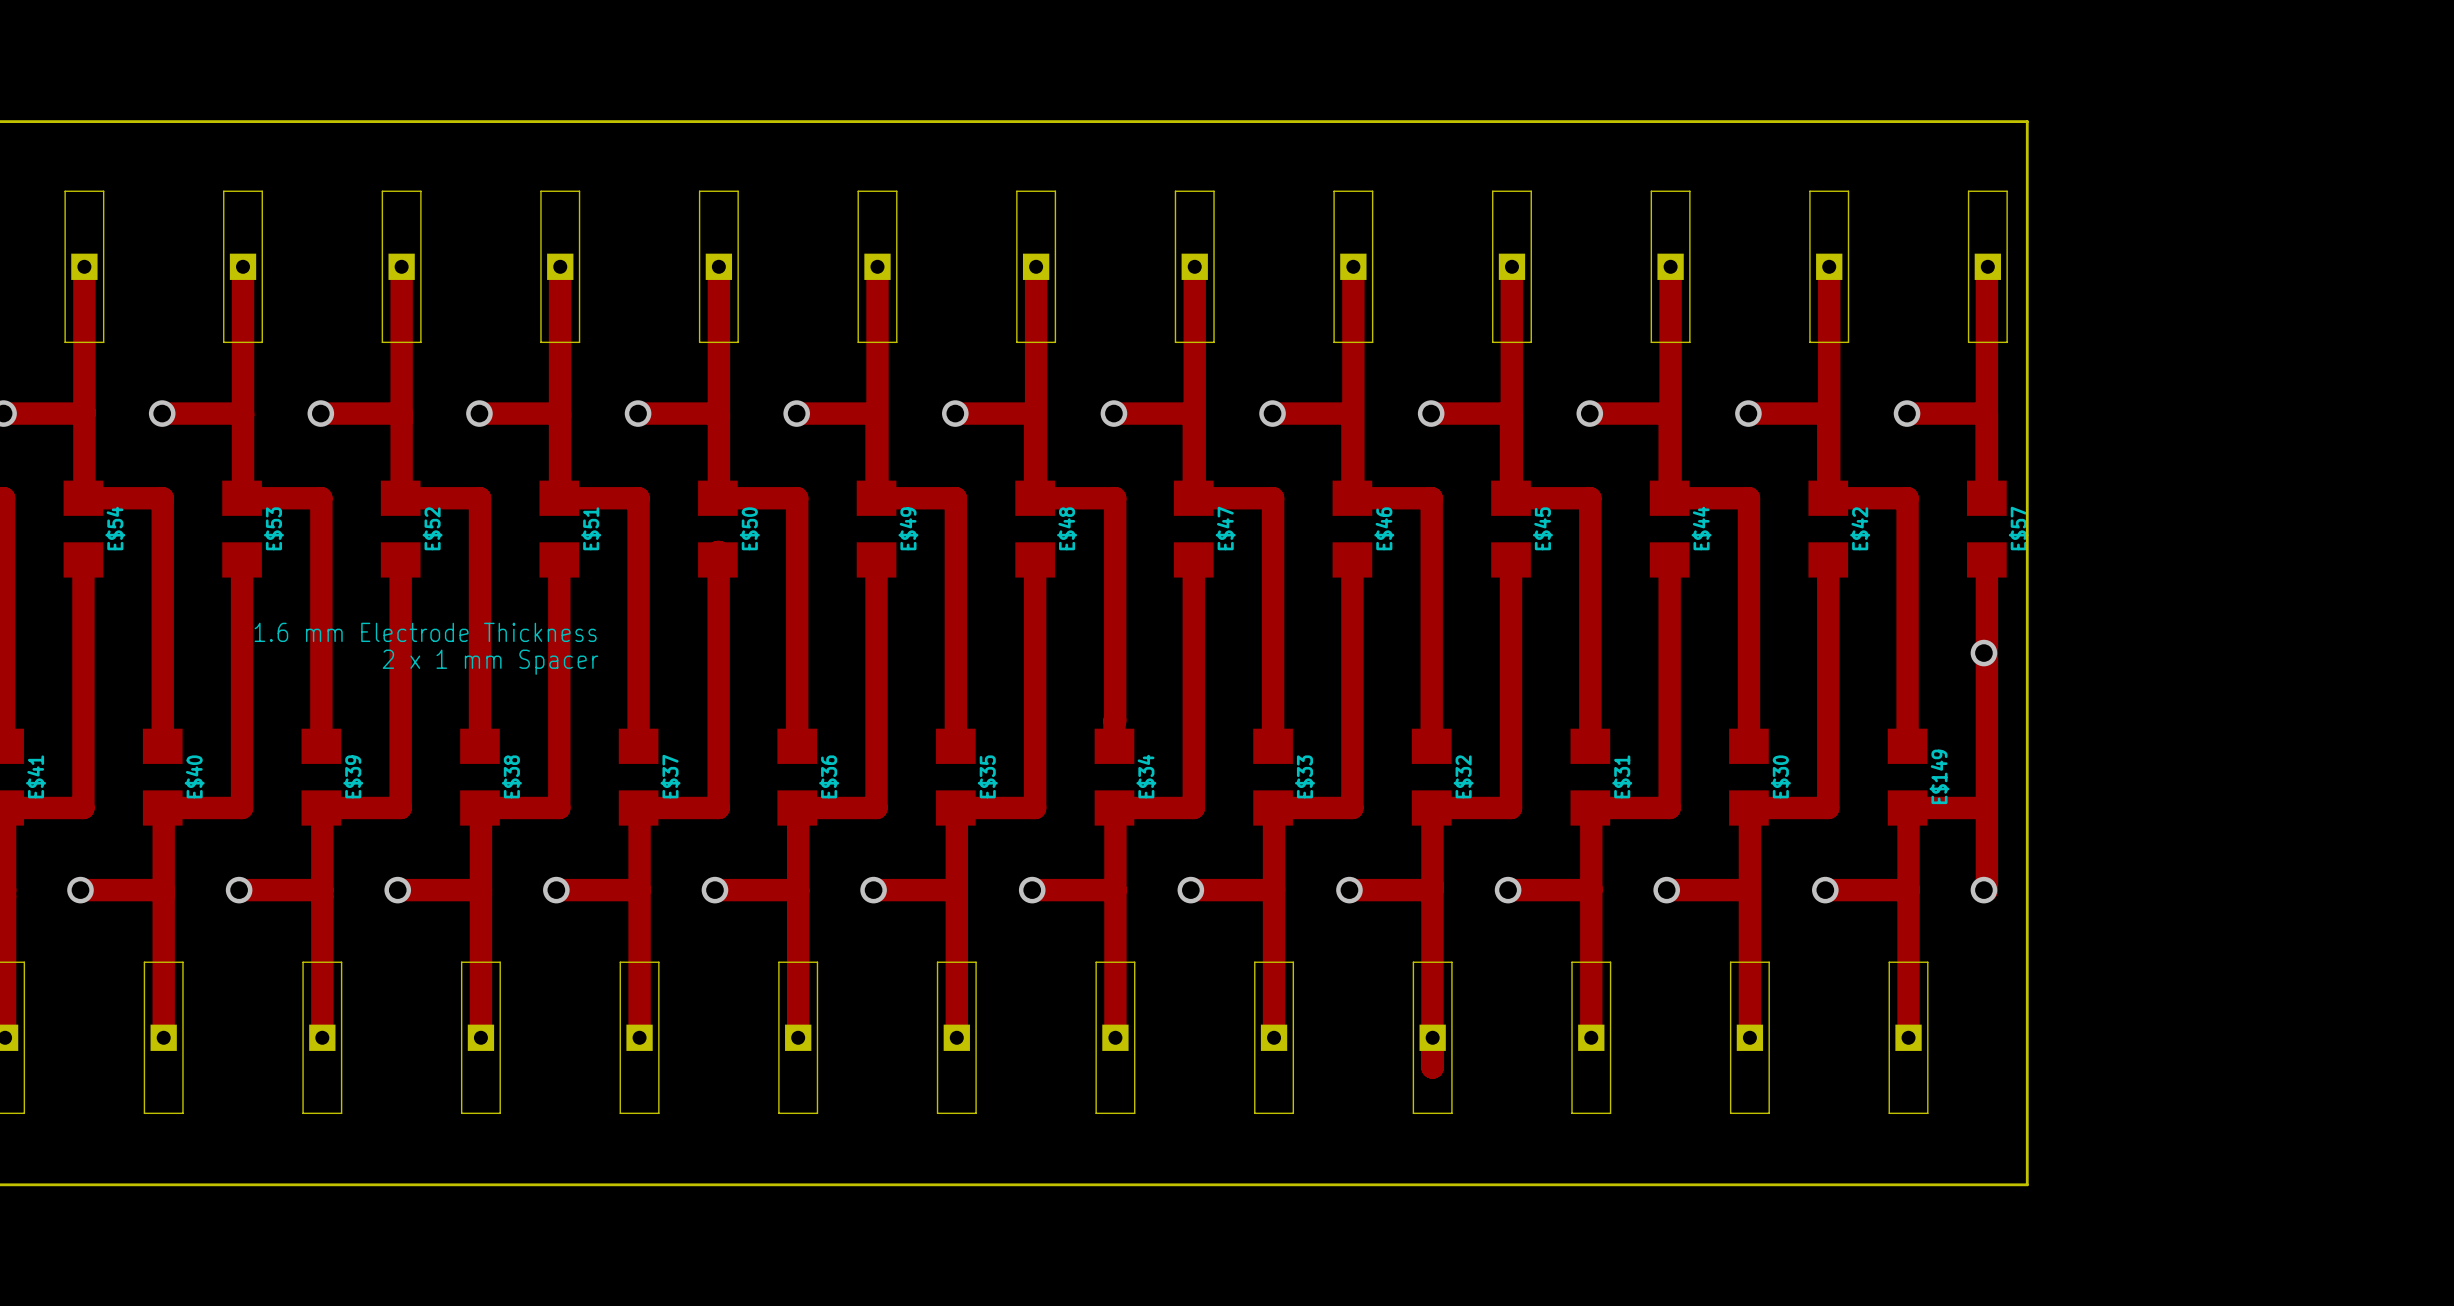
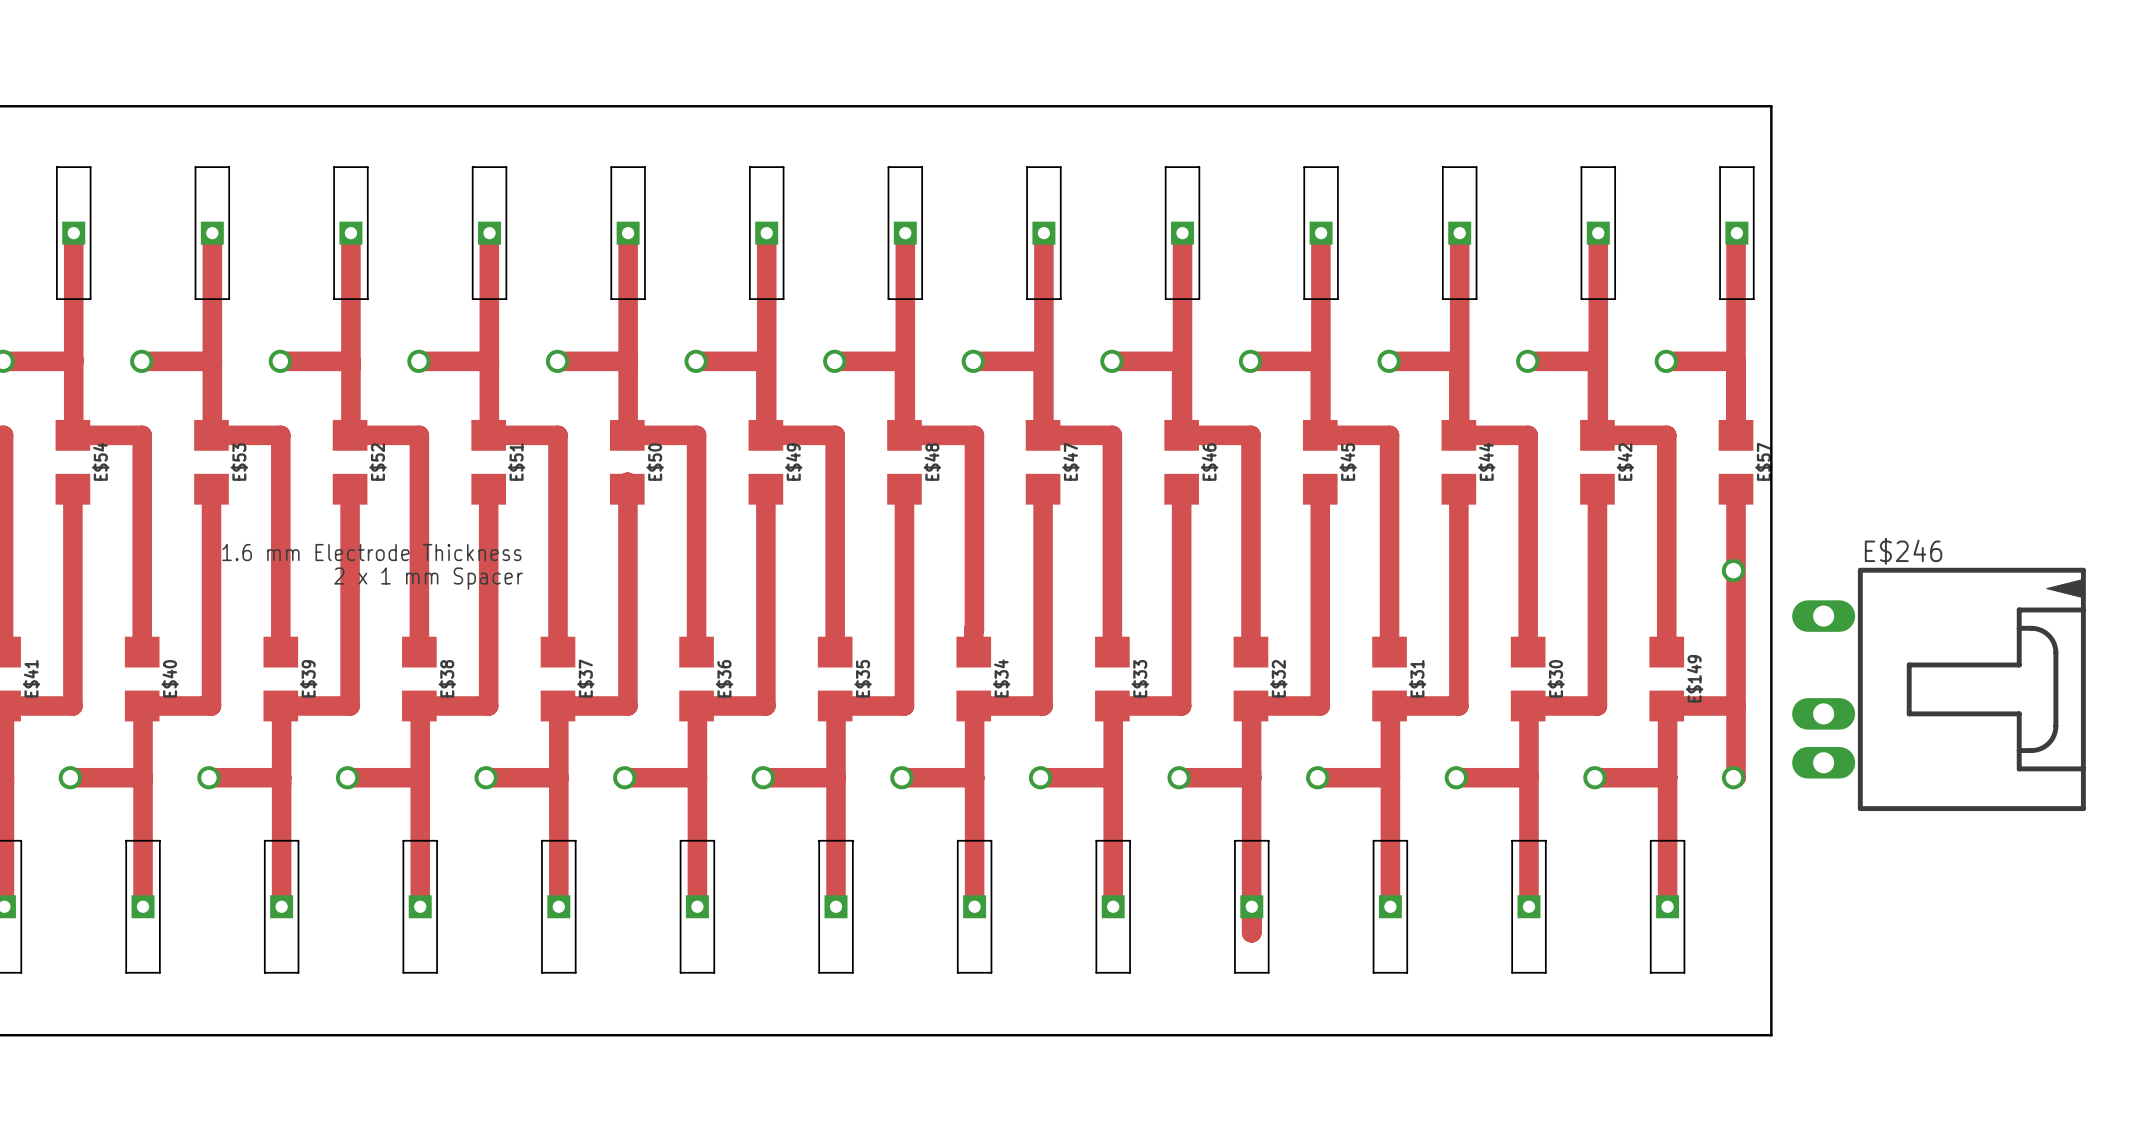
E$246: none -> (1938, 689)

